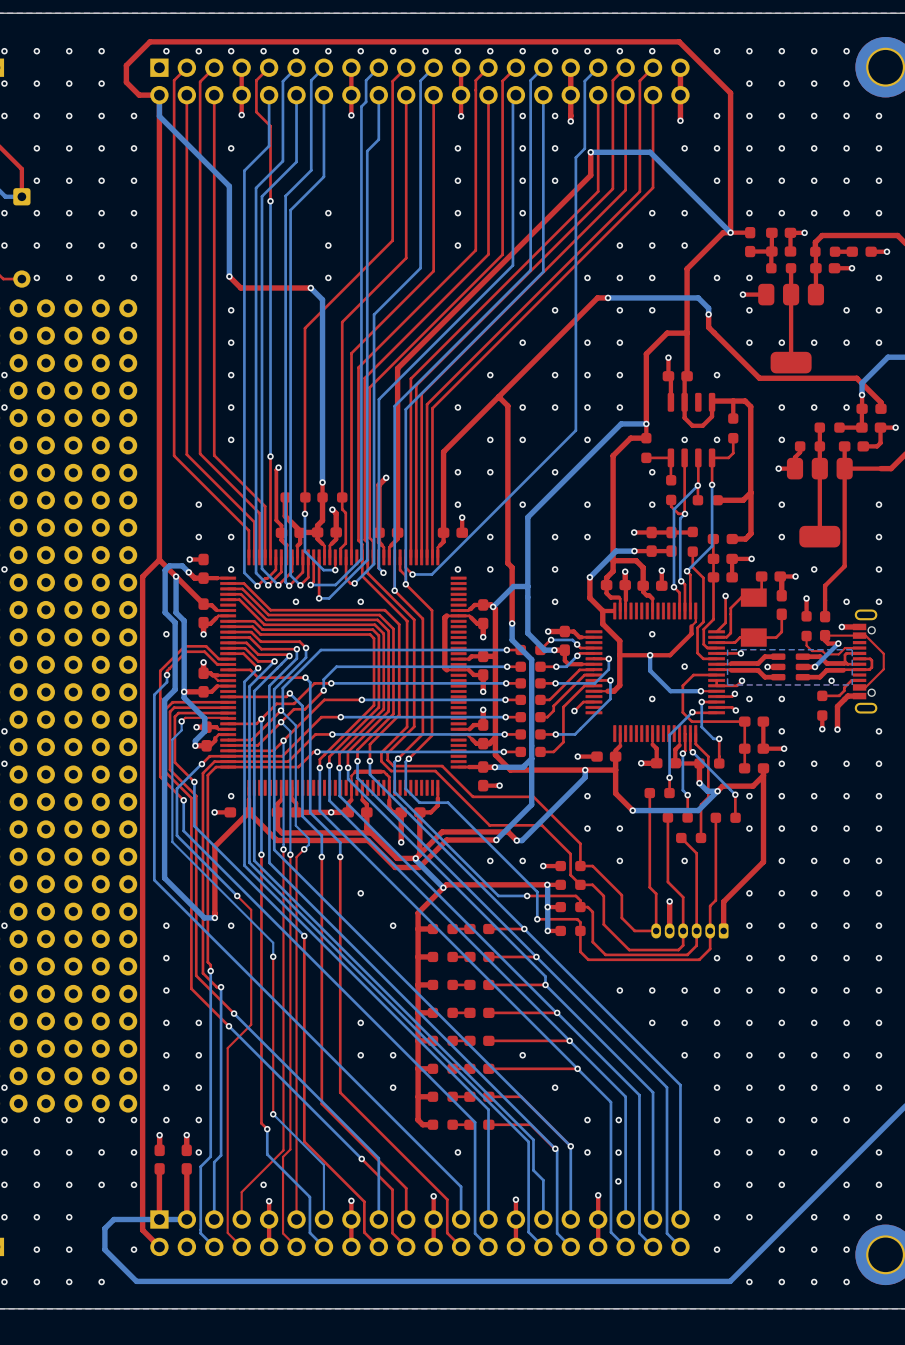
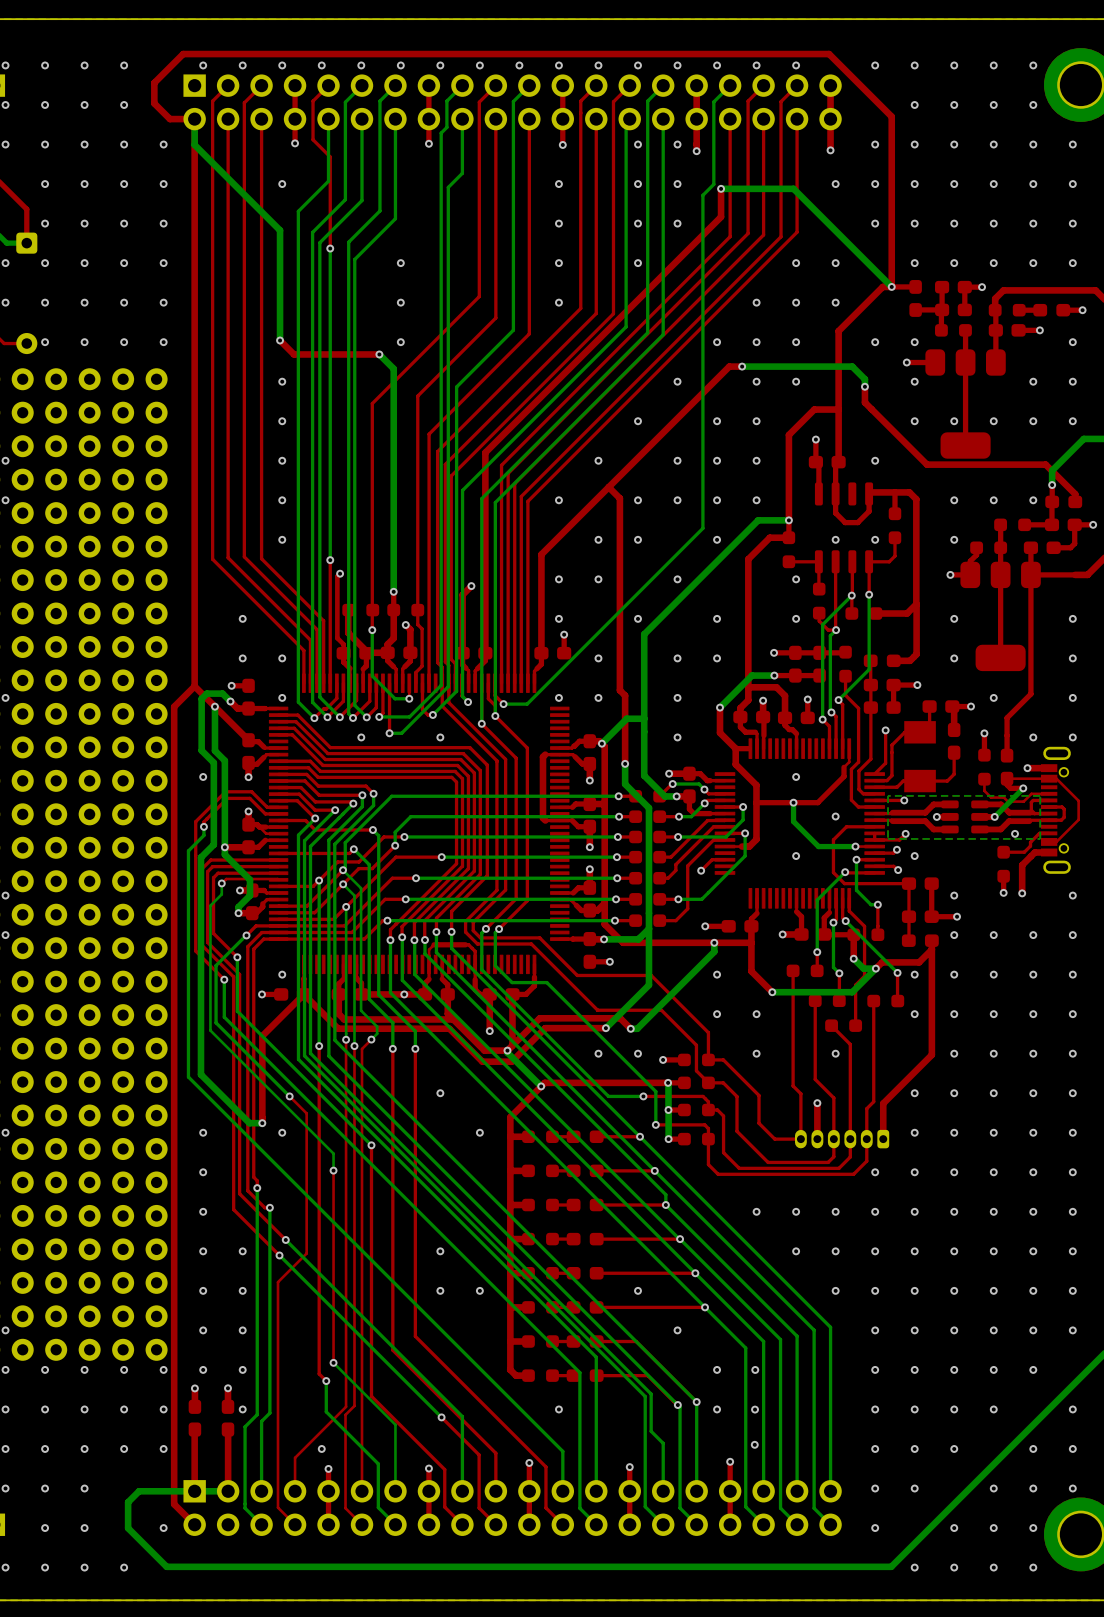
via: (781, 698) -> none
via: (393, 1087) -> none

